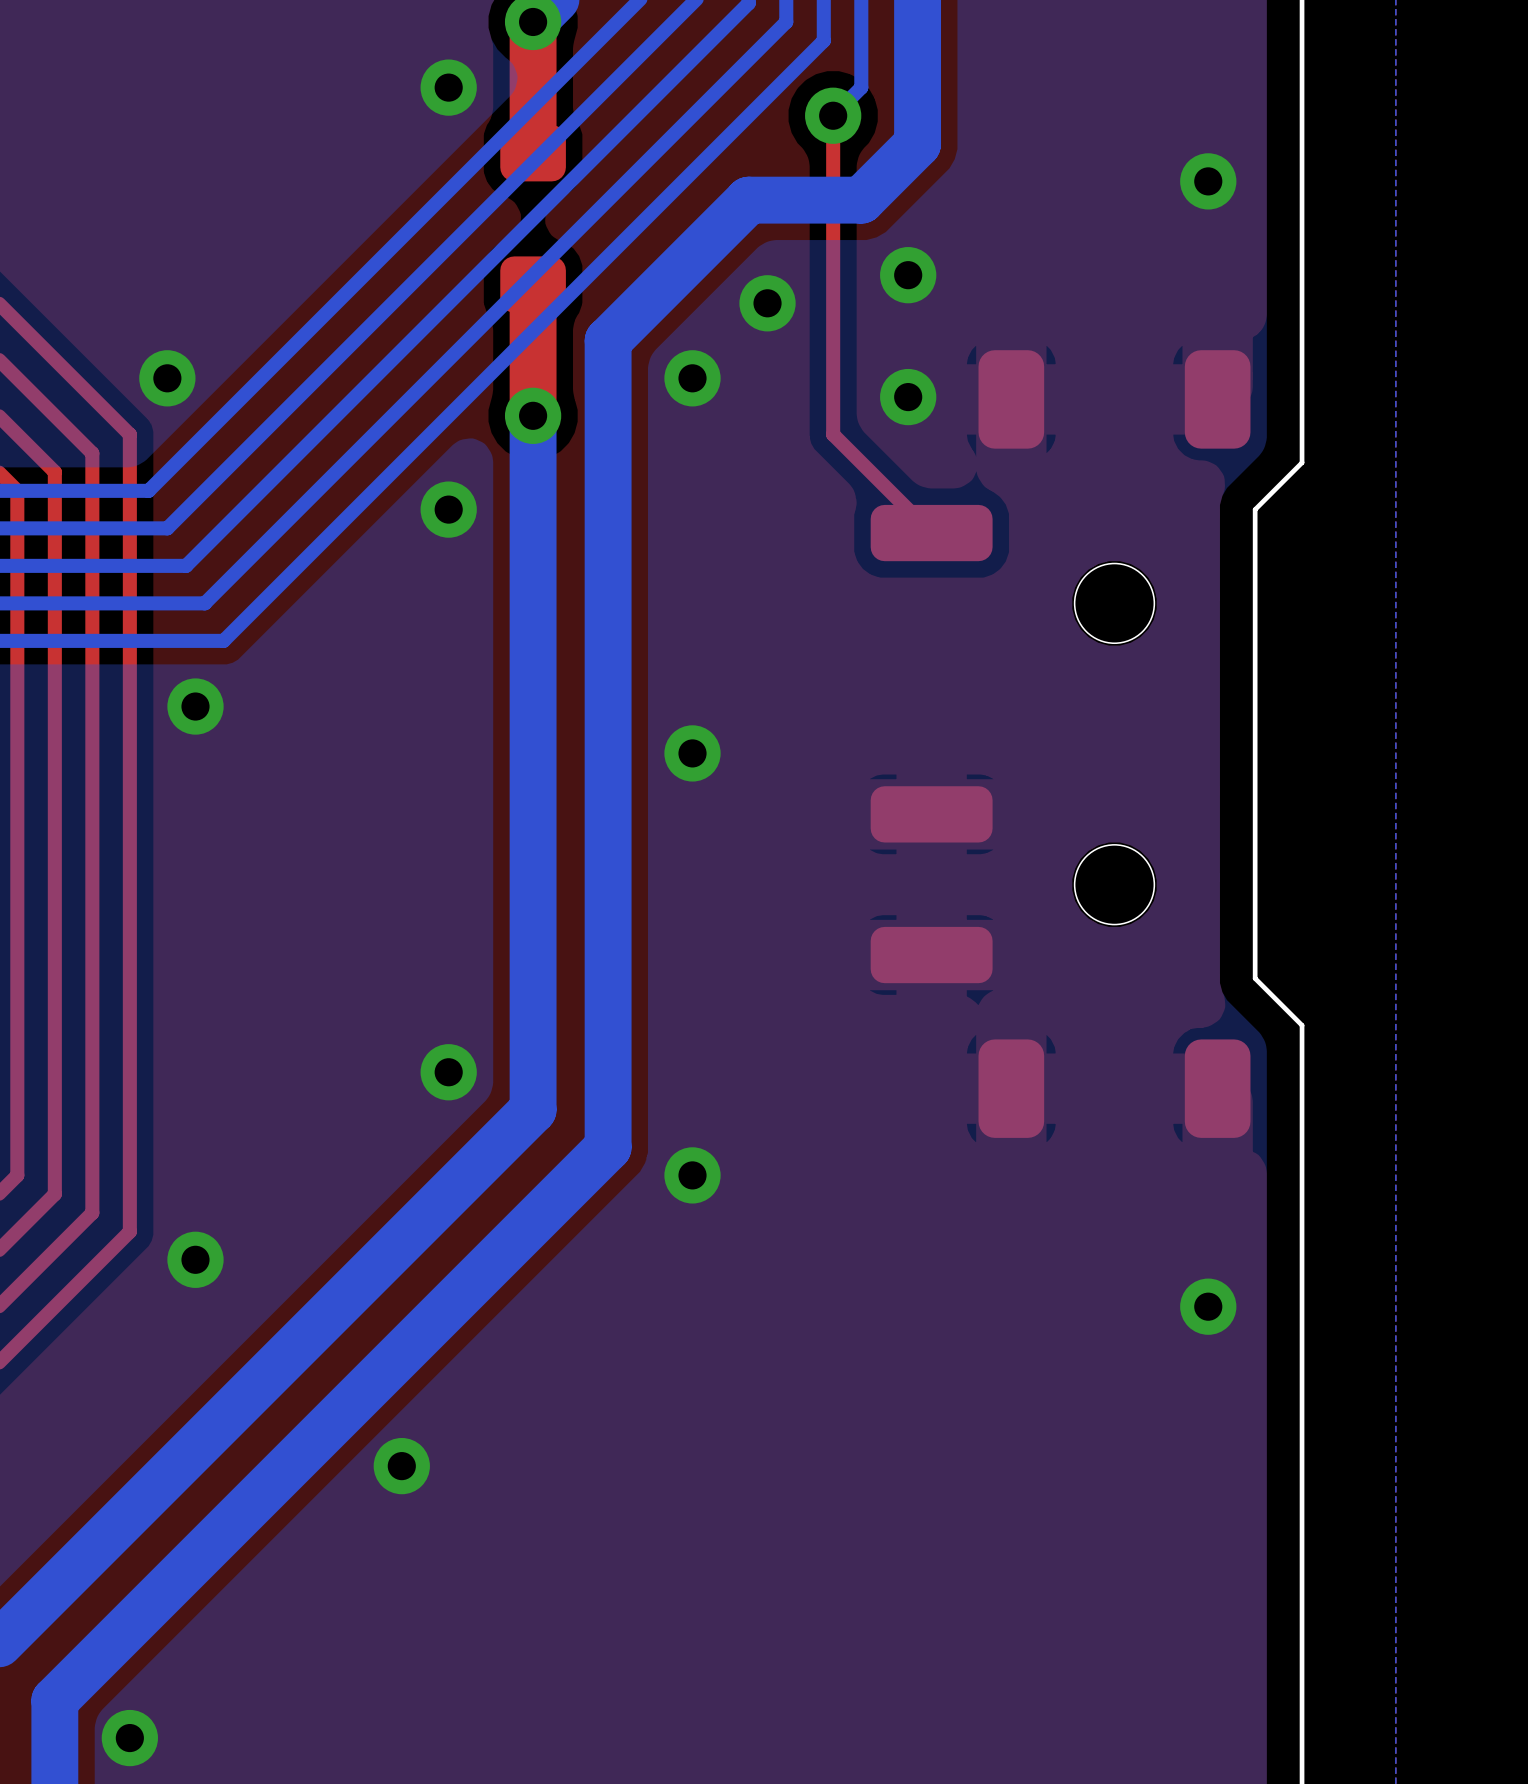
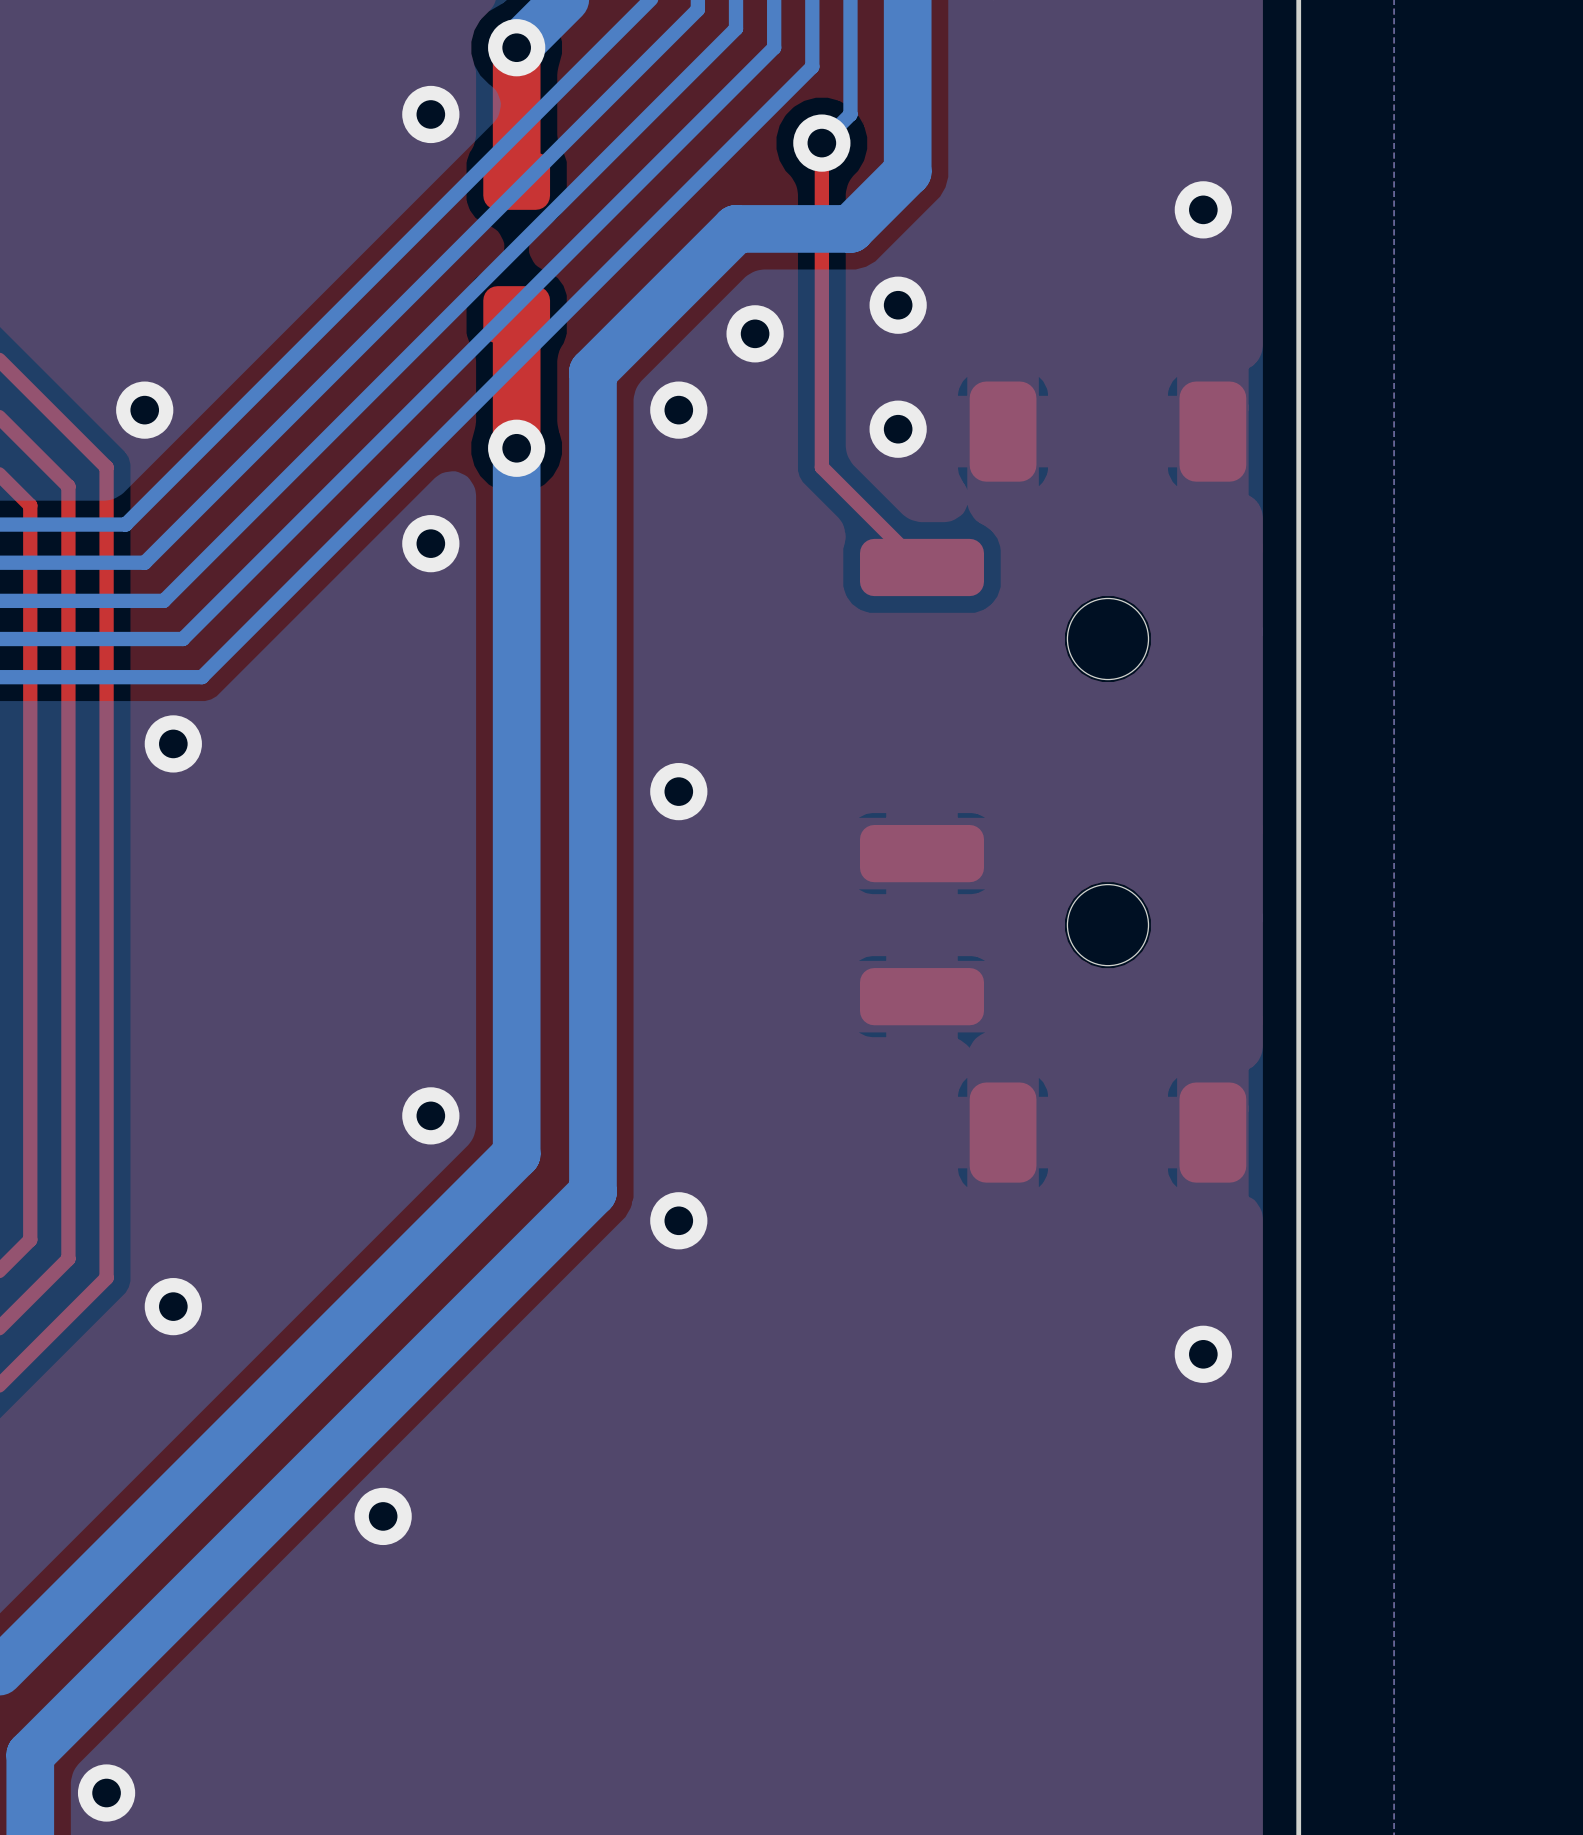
board edge: (1302, 462) (1255, 509) (1255, 978) (1302, 1025) -> (1298, 495) (1298, 1068)

